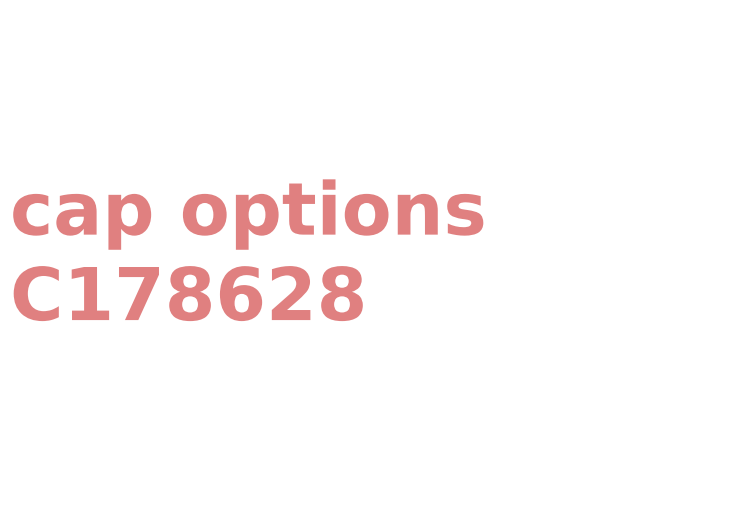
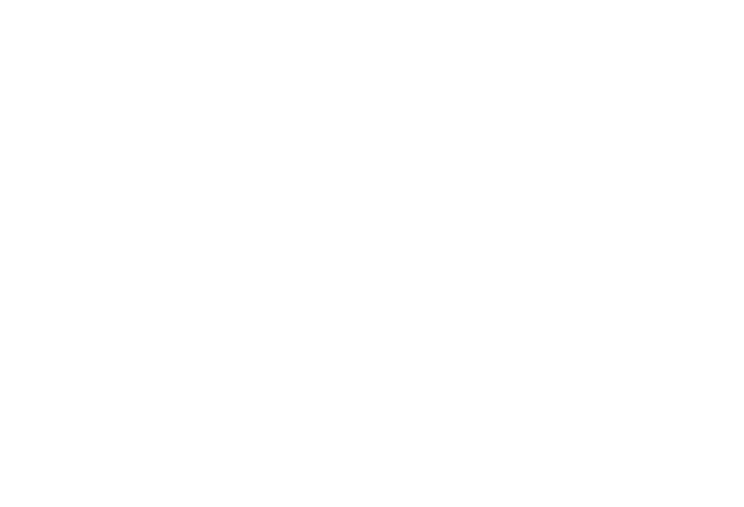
text: cap options (248, 214) -> none
text: C178628 (188, 293) -> none

